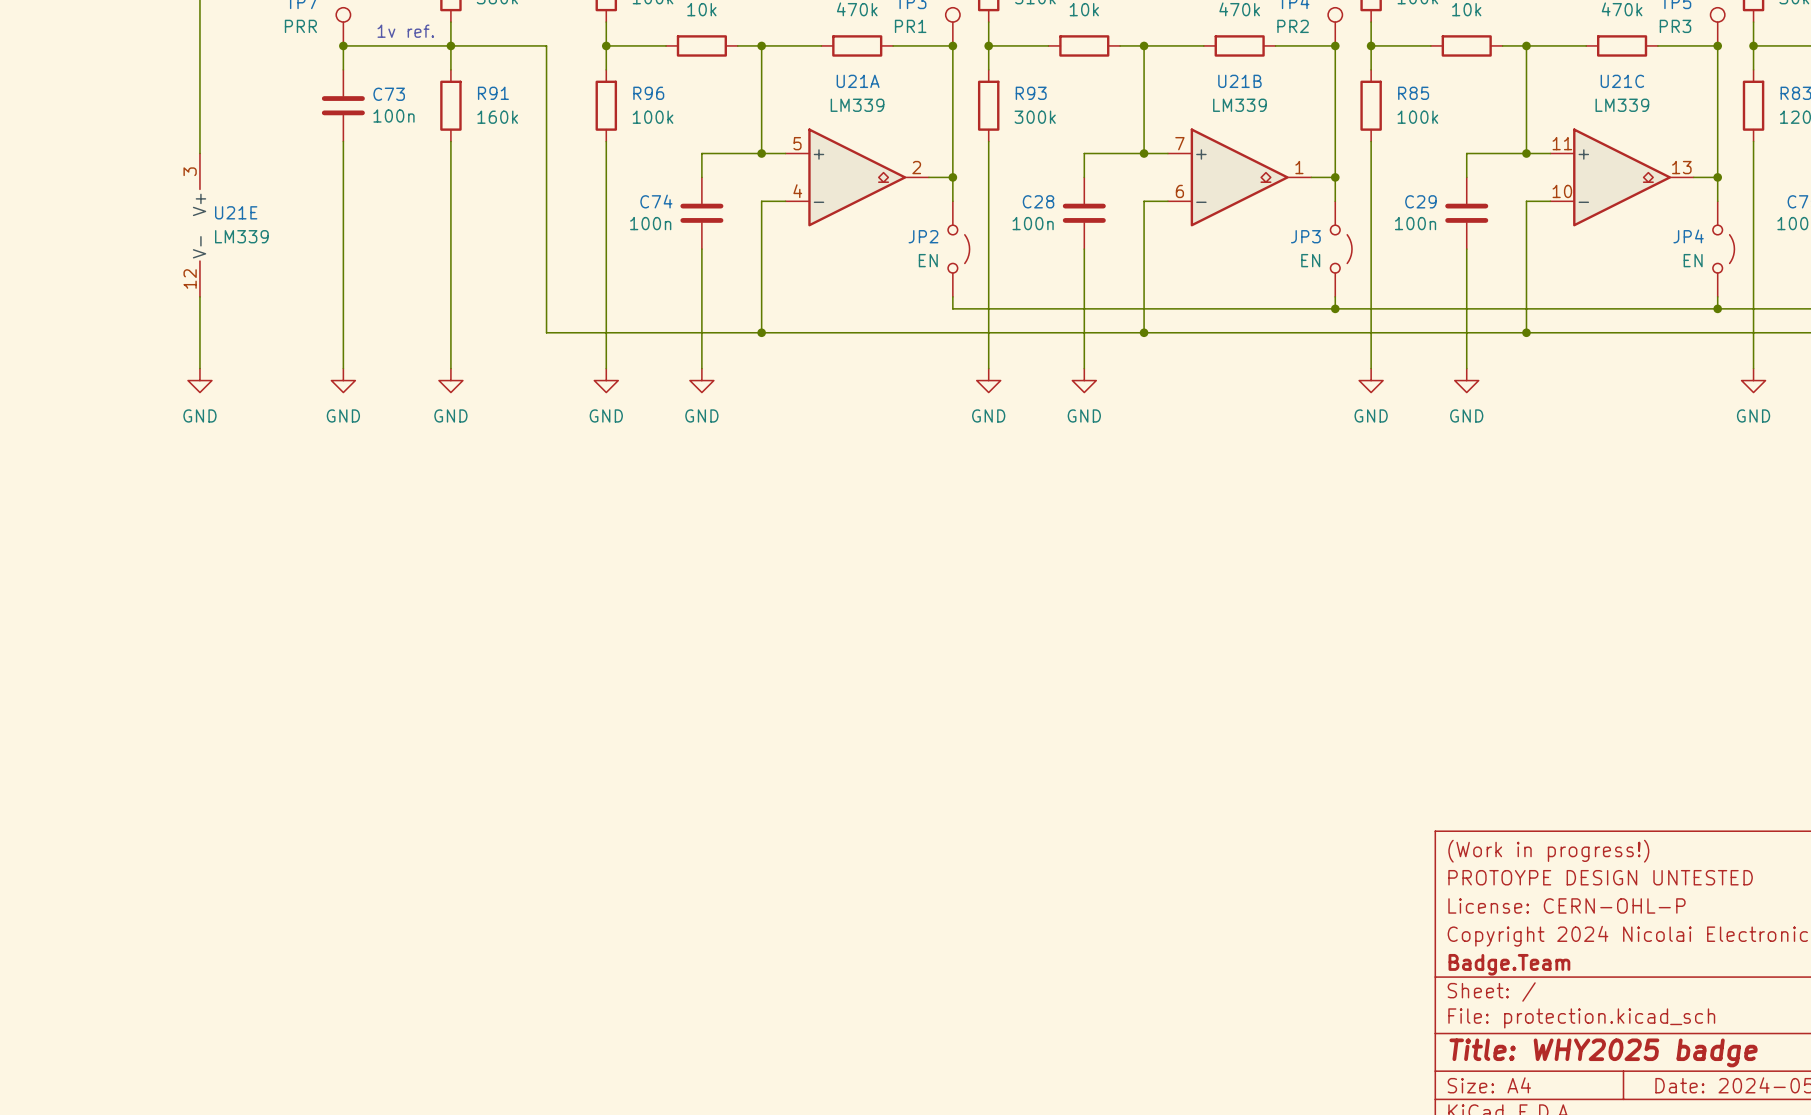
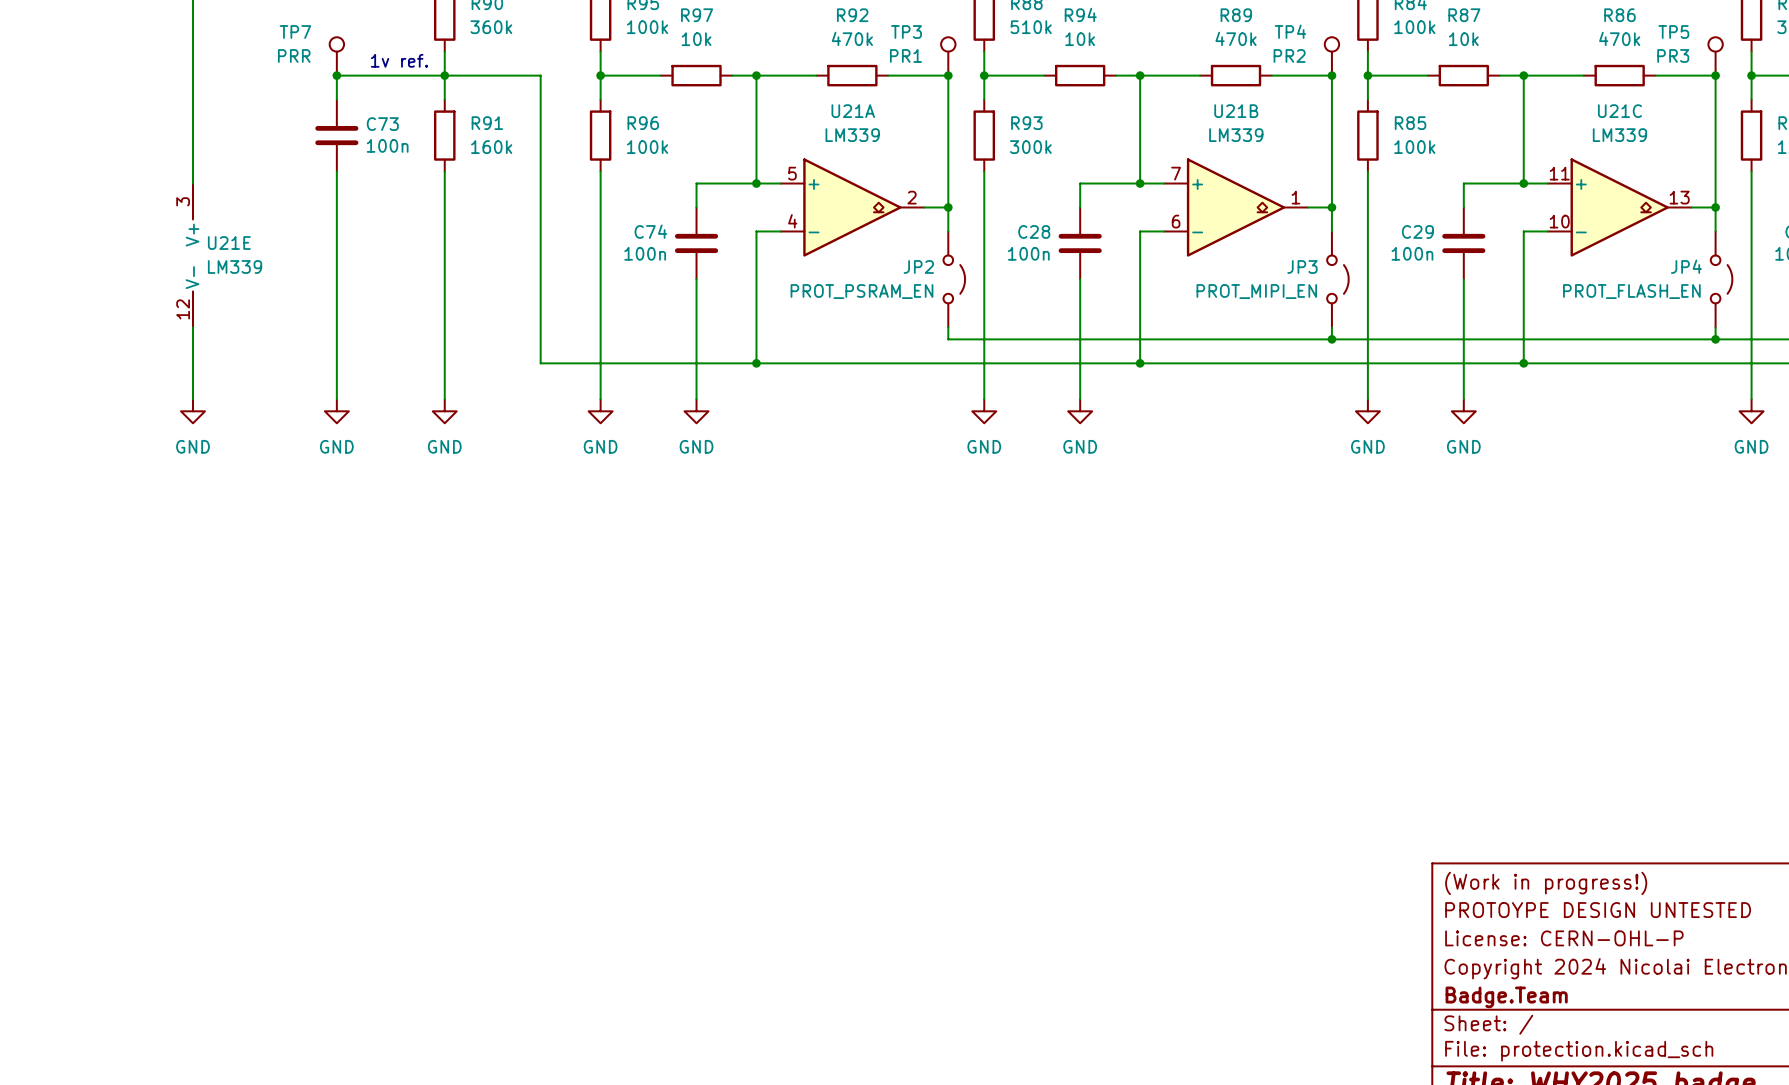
JP2 value: EN (928, 260) -> PROT_PSRAM_EN (862, 291)
JP3 value: EN (1310, 260) -> PROT_MIPI_EN (1256, 291)
JP4 value: EN (1693, 260) -> PROT_FLASH_EN (1631, 291)

